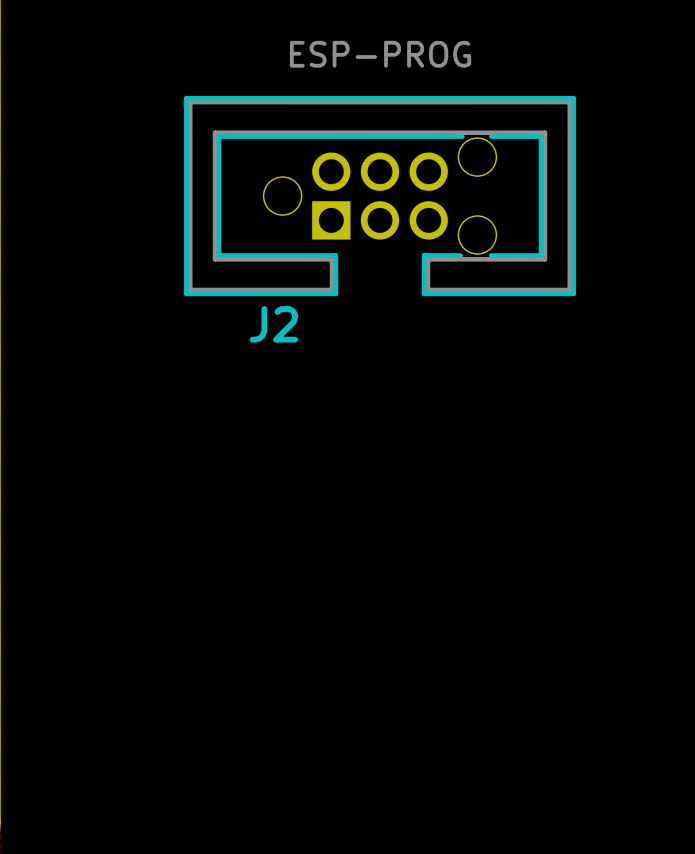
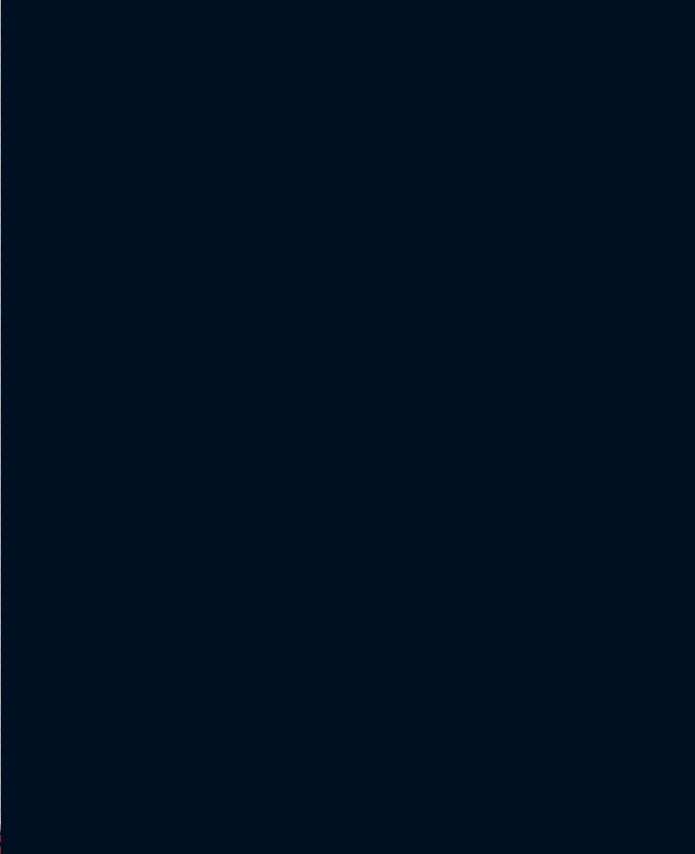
J2: ESP-PROG (380, 196) -> none

